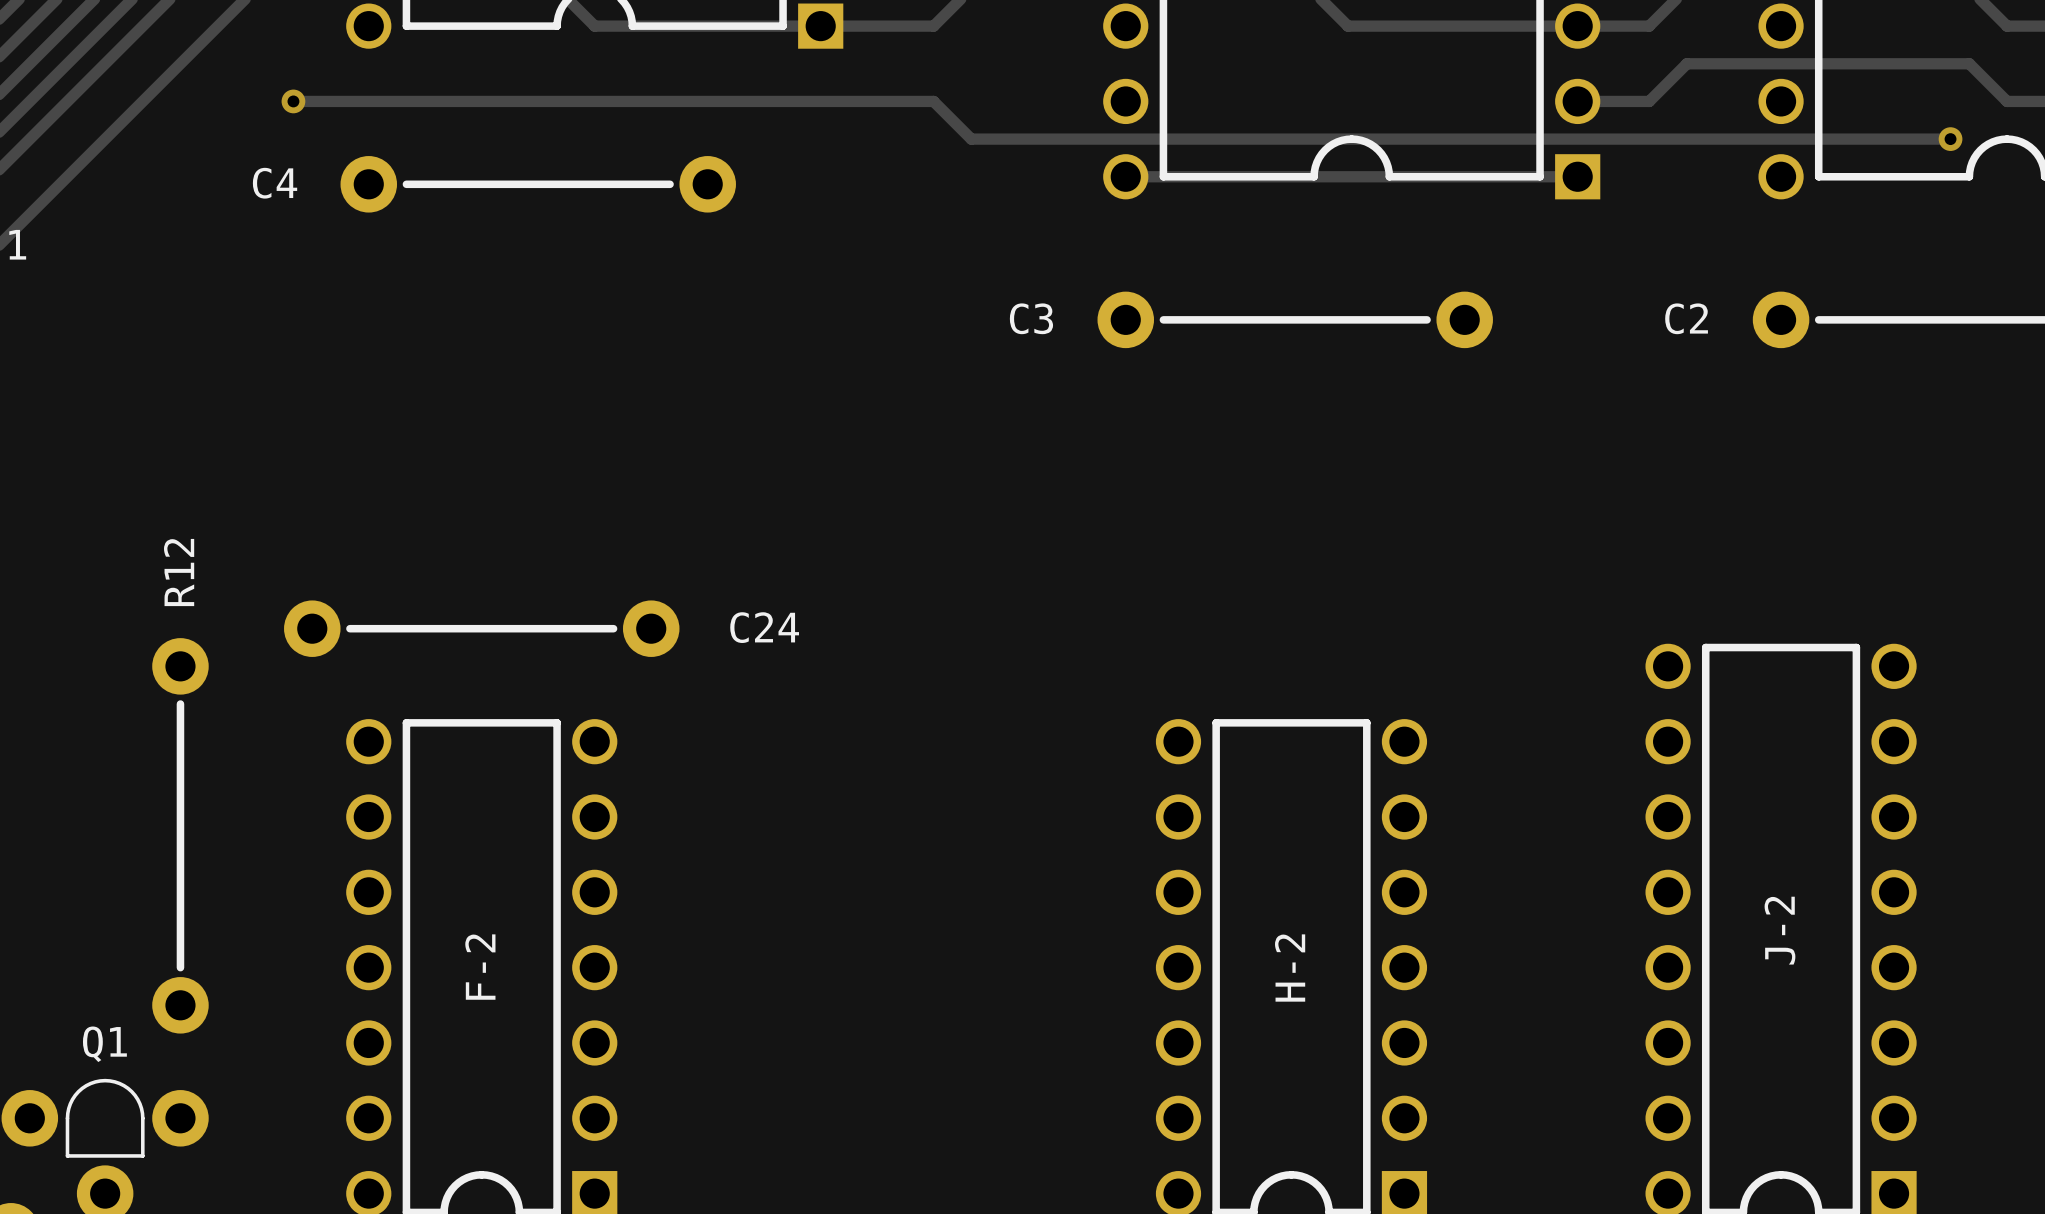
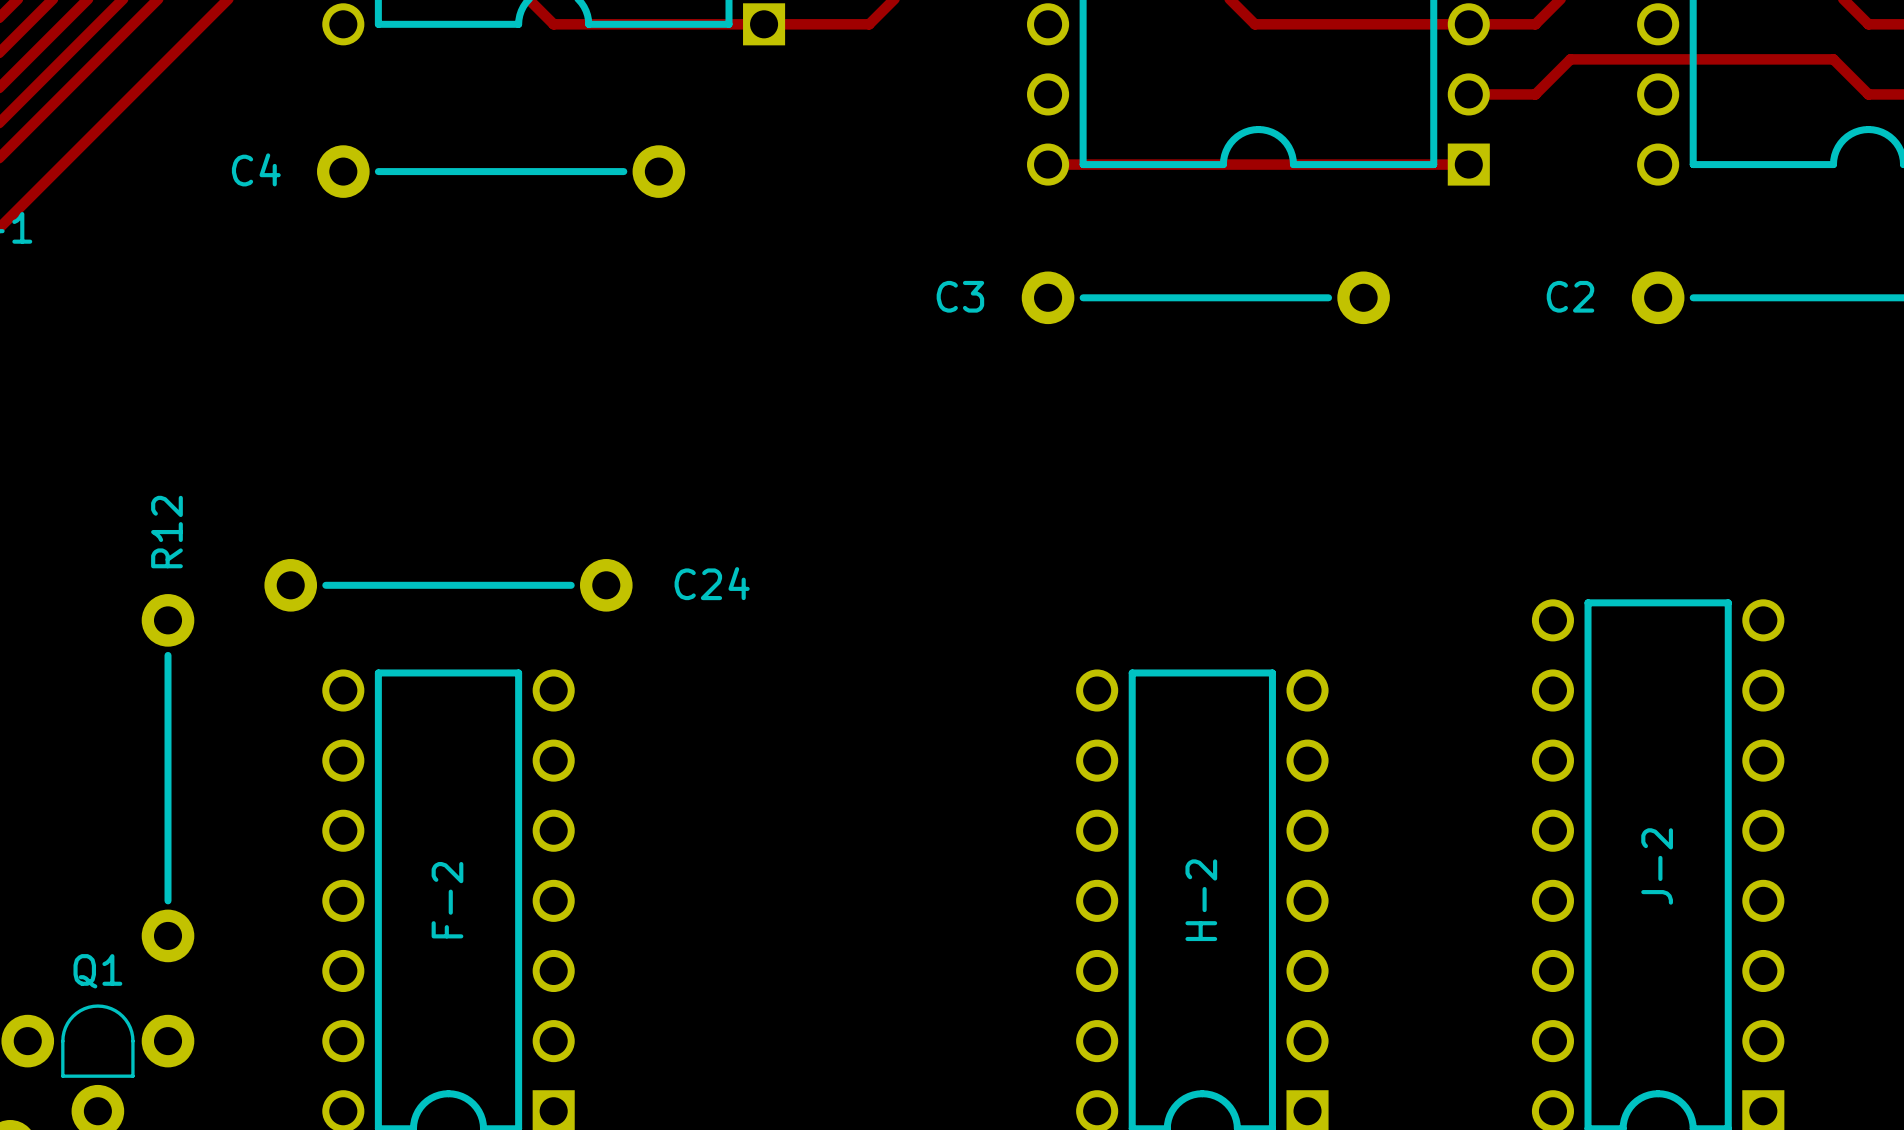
track: (293, 101) (933, 101) (971, 139) (1950, 139) -> none
via: (293, 101) -> none
via: (1950, 139) -> none

